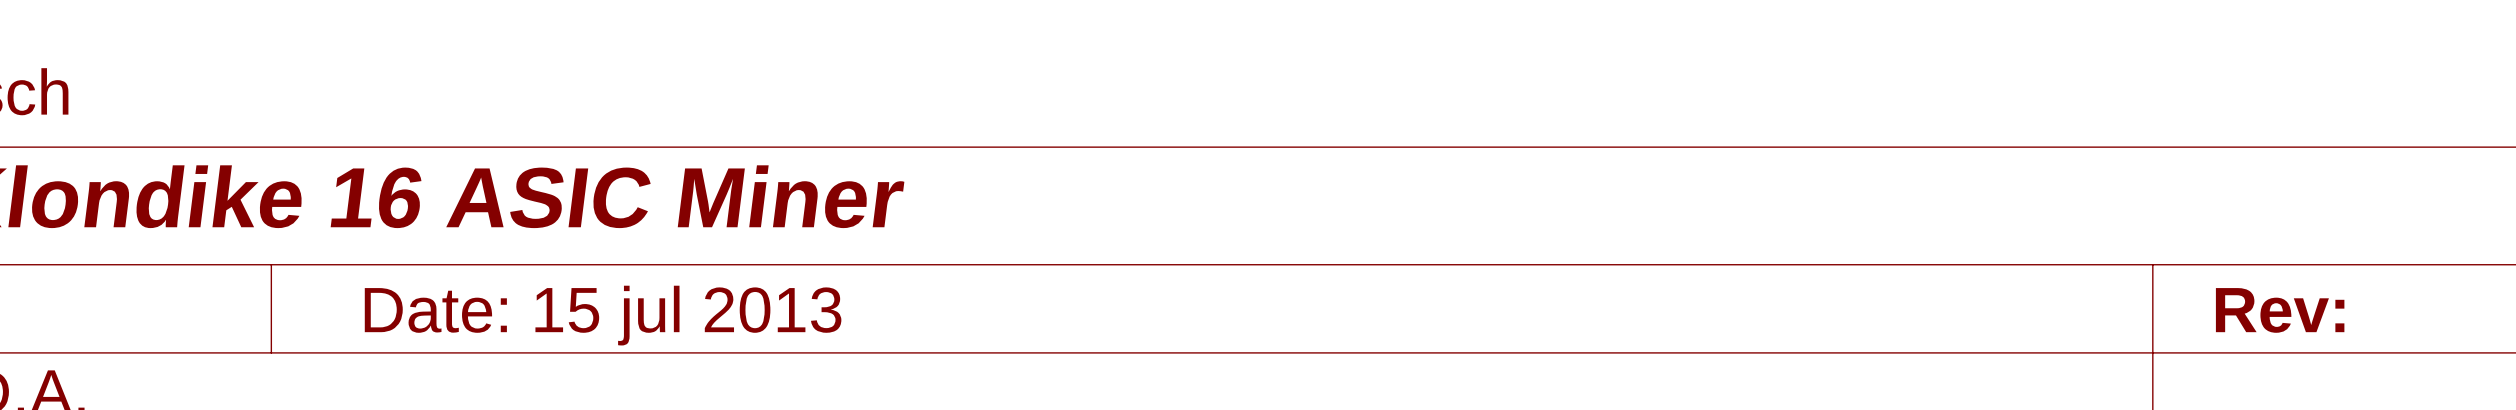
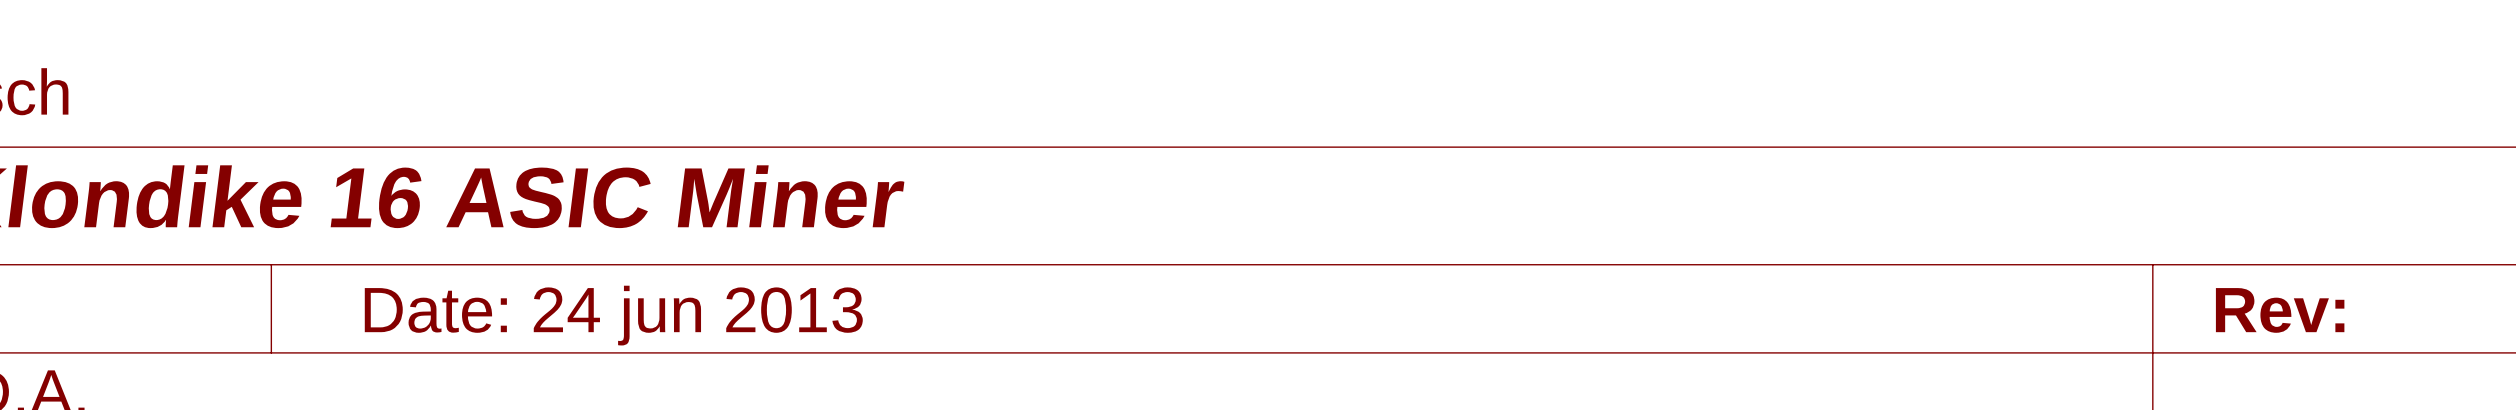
title block: Date: 15 jul 2013 (603, 315) -> Date: 24 jun 2013 (613, 315)

